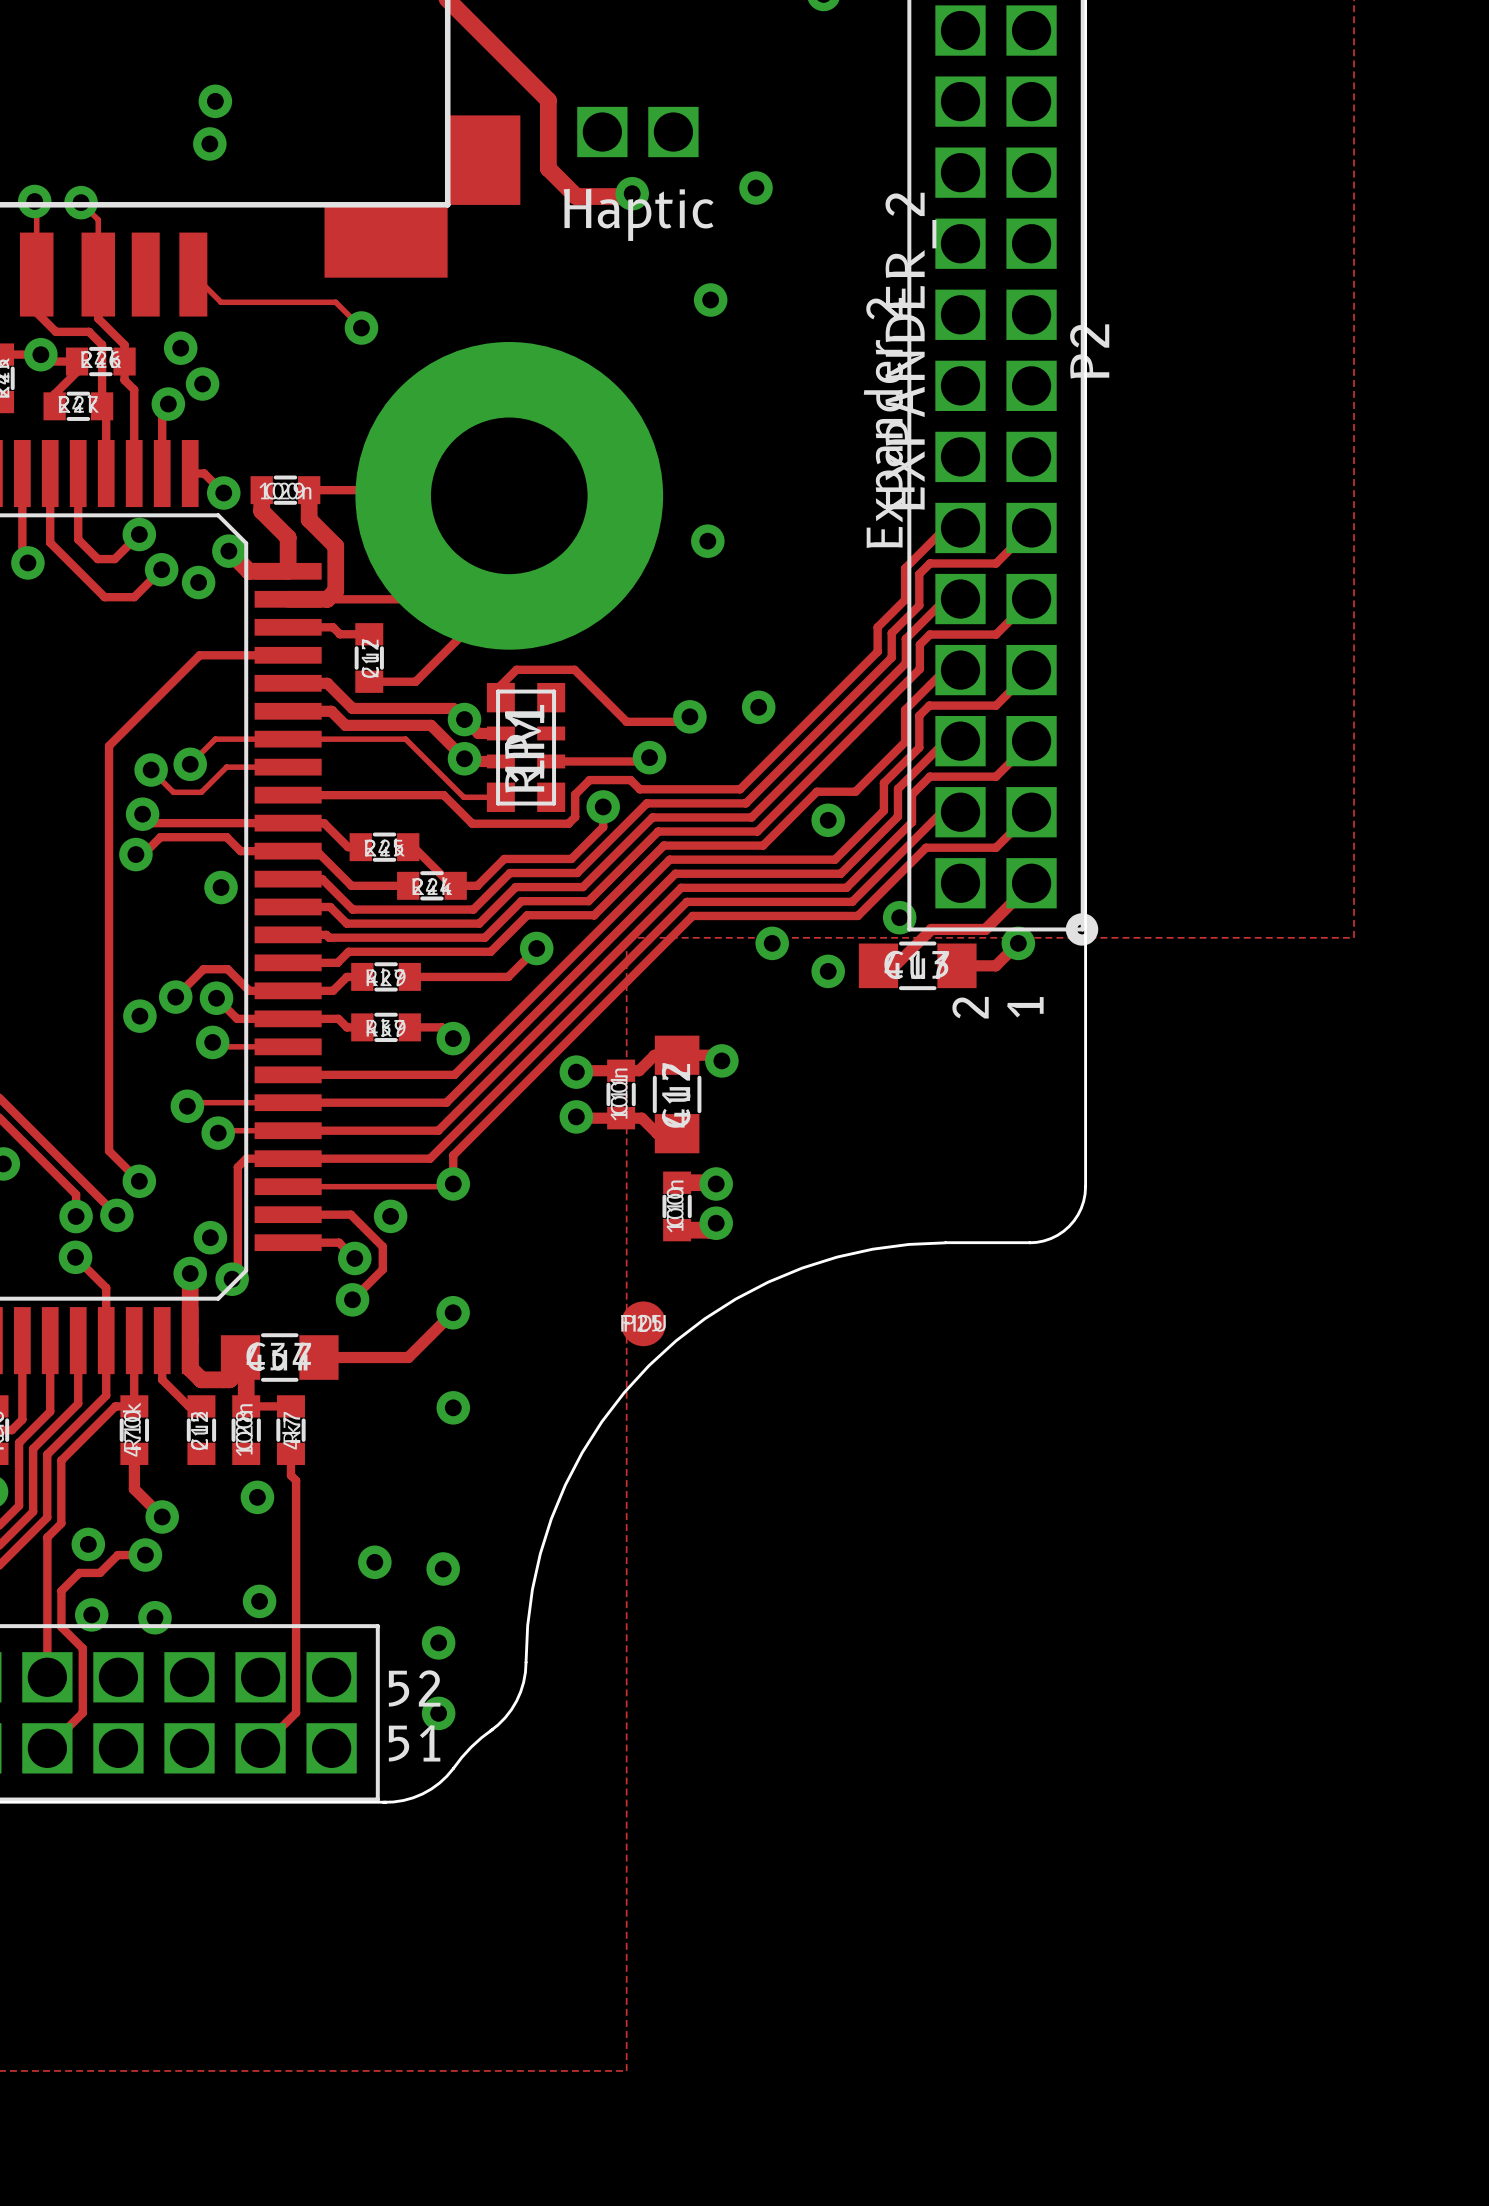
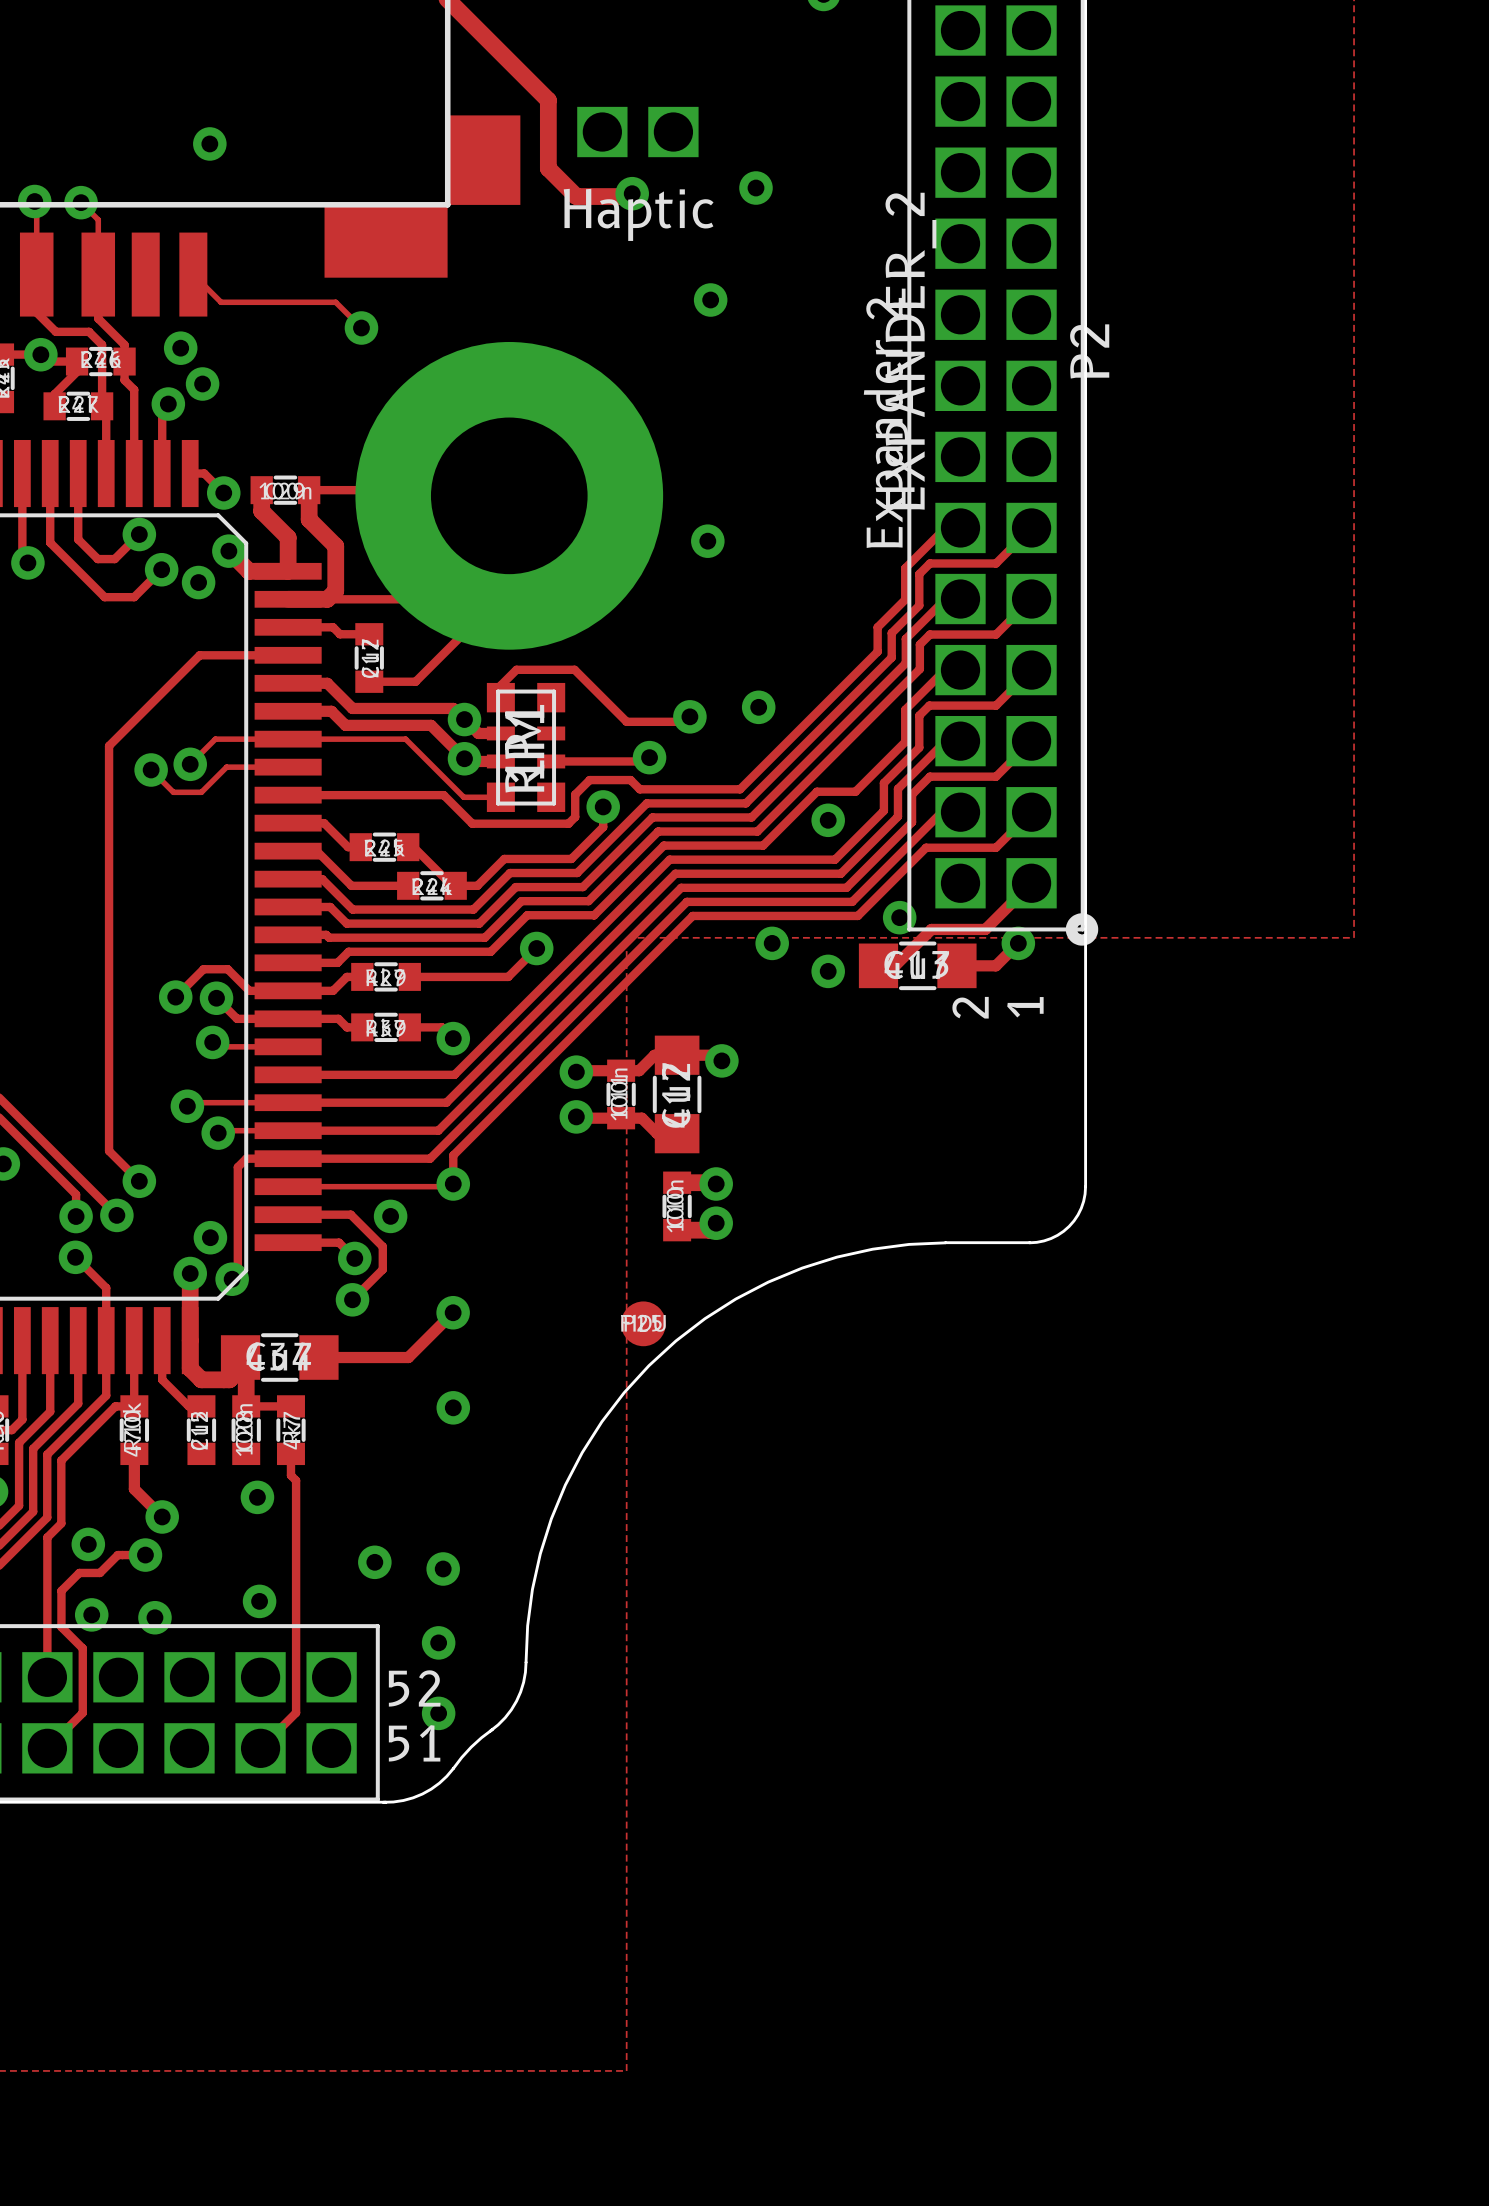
via: (215, 101) -> none
track: (142, 814) (151, 823) (288, 823) -> none
via: (142, 814) -> none
track: (288, 851) (240, 851) (226, 837) (160, 837) (143, 854) (135, 854) -> none
via: (135, 854) -> none
via: (221, 887) -> none
via: (139, 1016) -> none

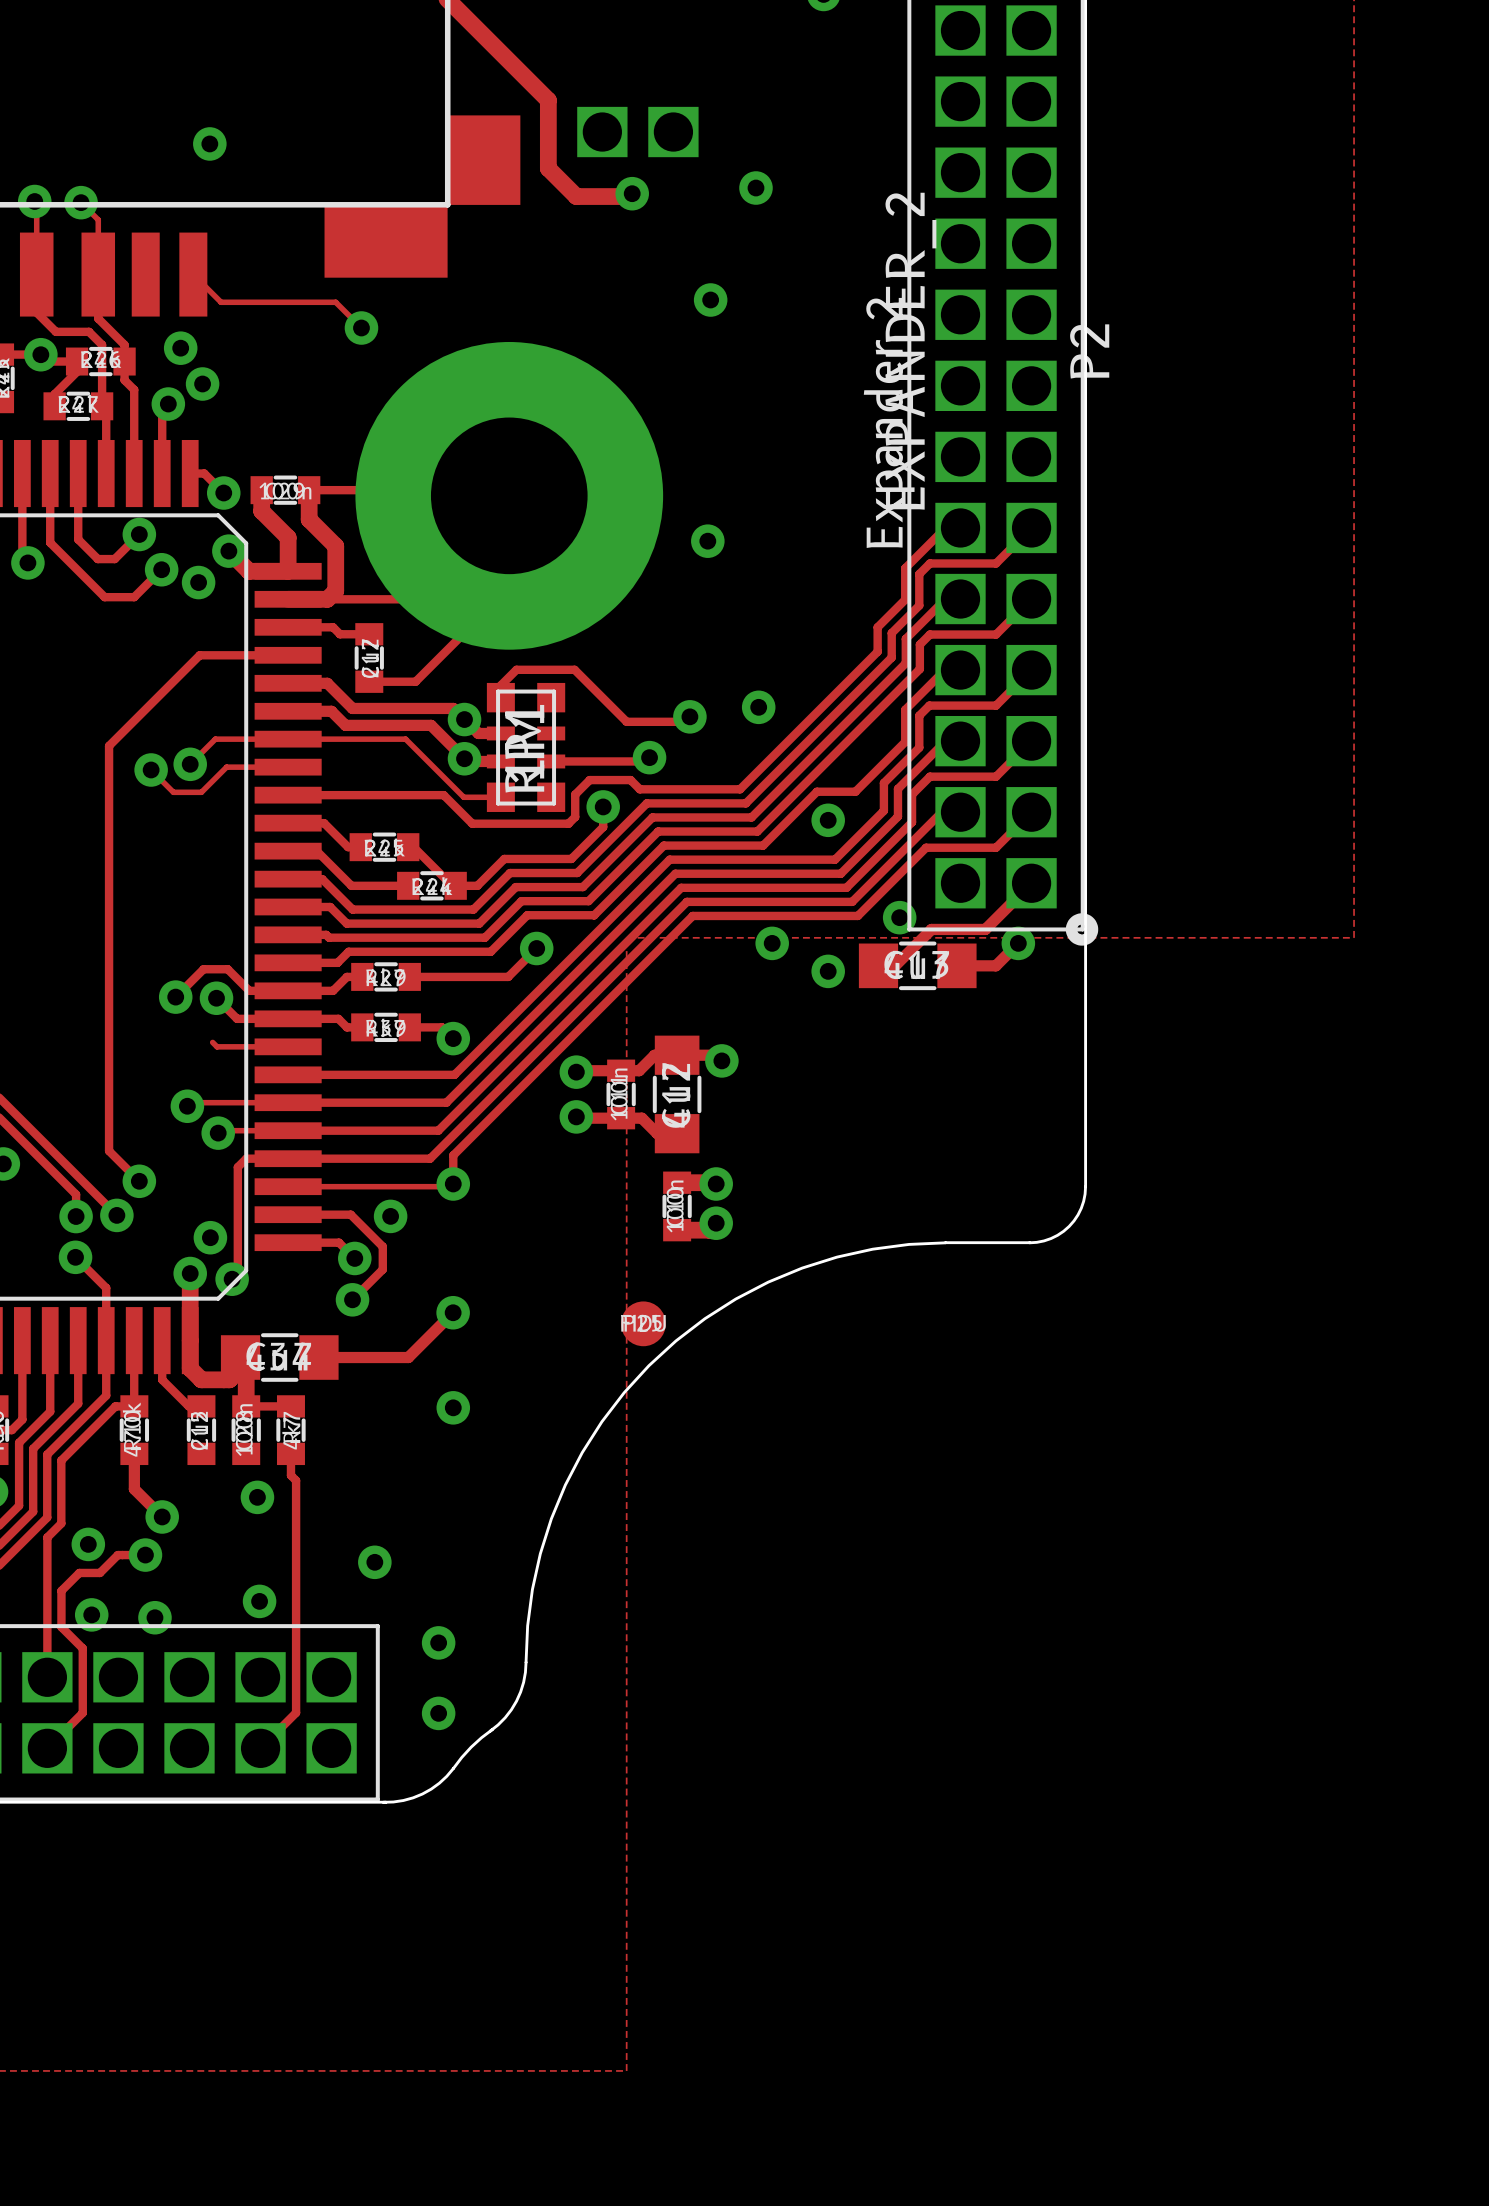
text: Haptic (638, 214) -> none
text: 2 (970, 1007) -> none
text: 1 (1025, 1007) -> none
via: (212, 1042) -> none
via: (443, 1568) -> none
text: 52 (414, 1688) -> none
text: 51 (414, 1743) -> none

